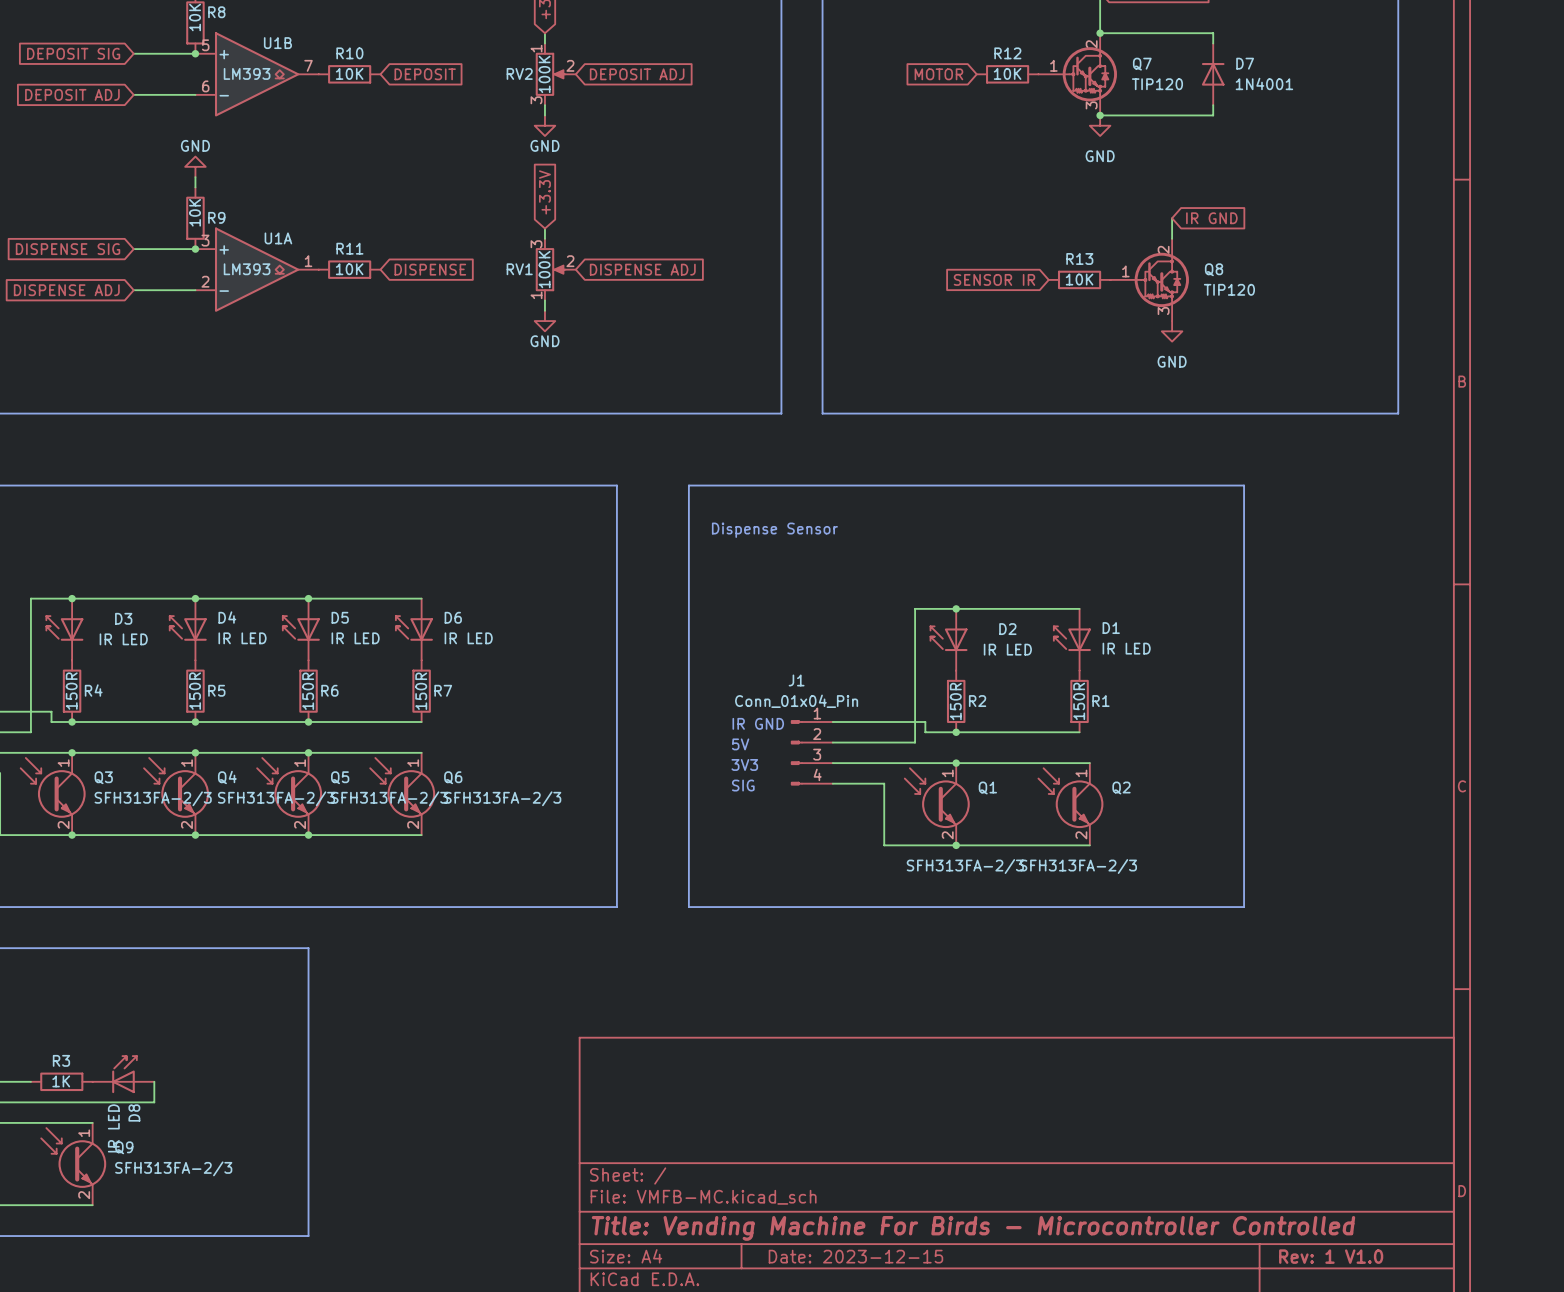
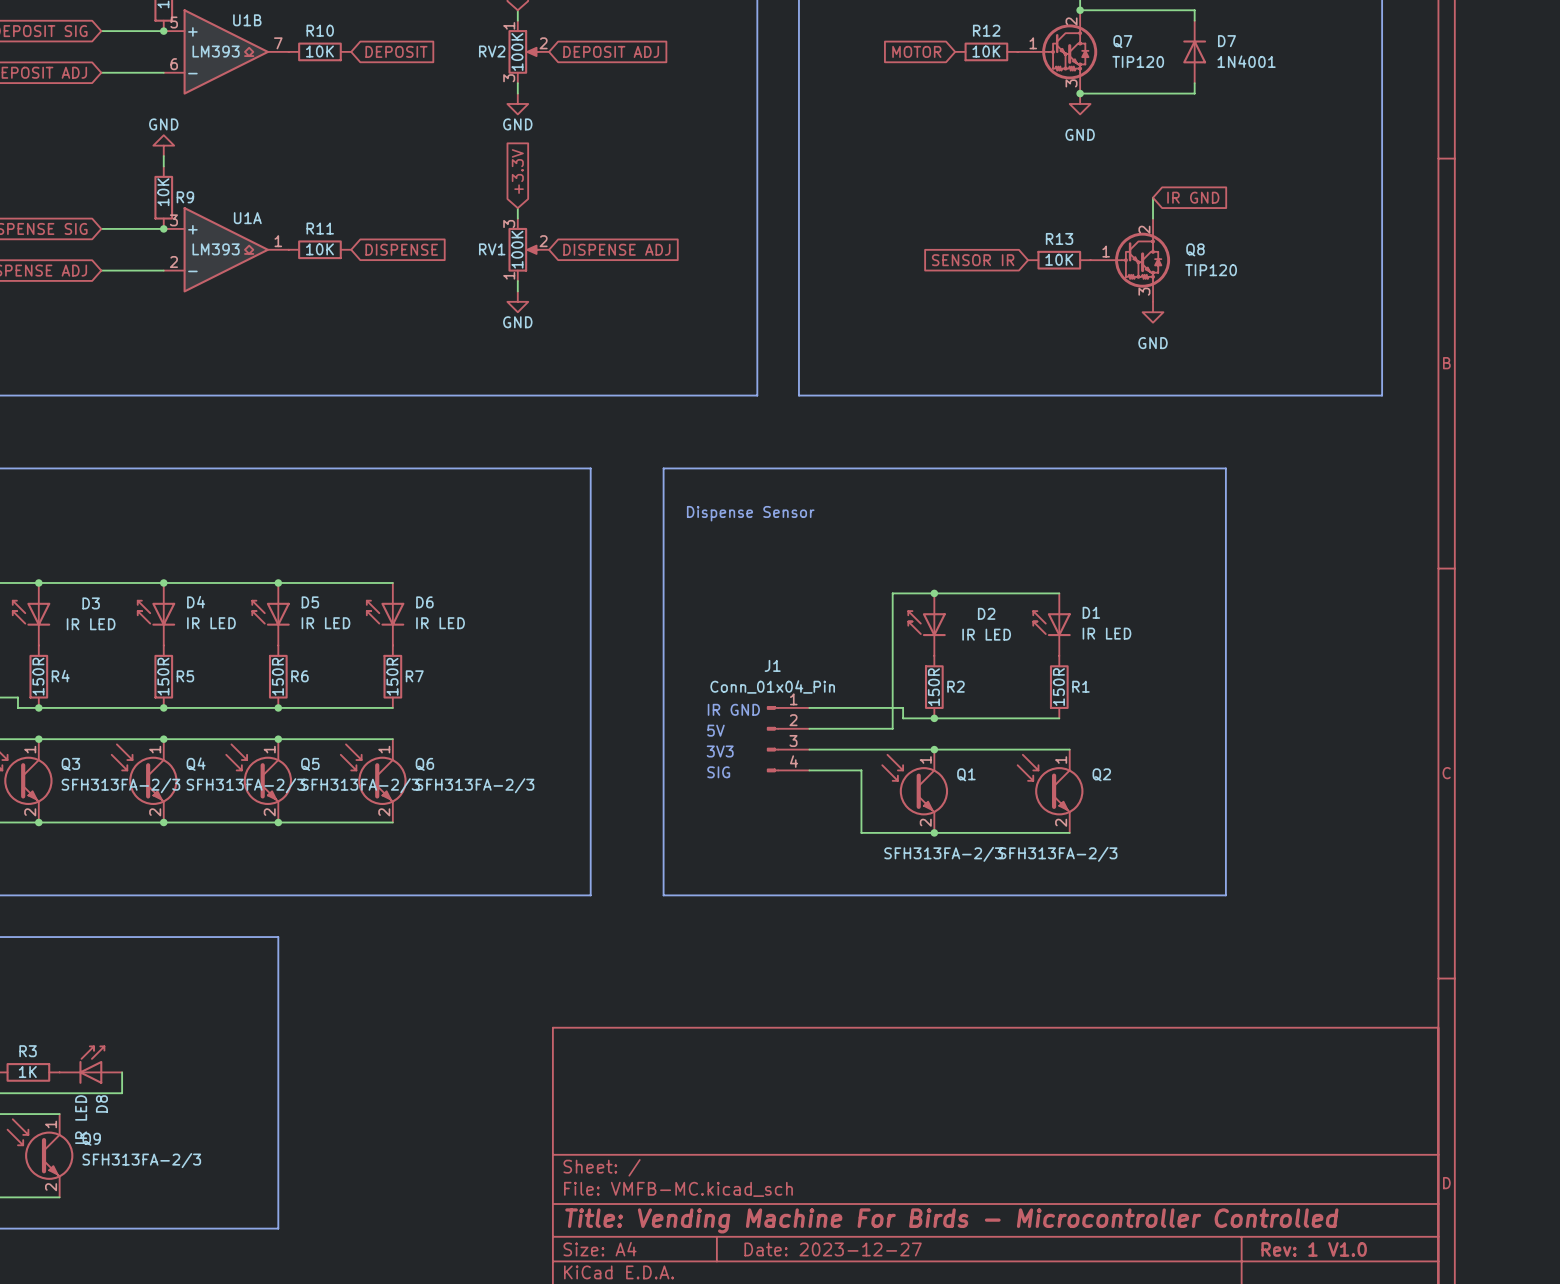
title block: Date: 2023-12-15 (855, 1256) -> Date: 2023-12-27 (833, 1249)

